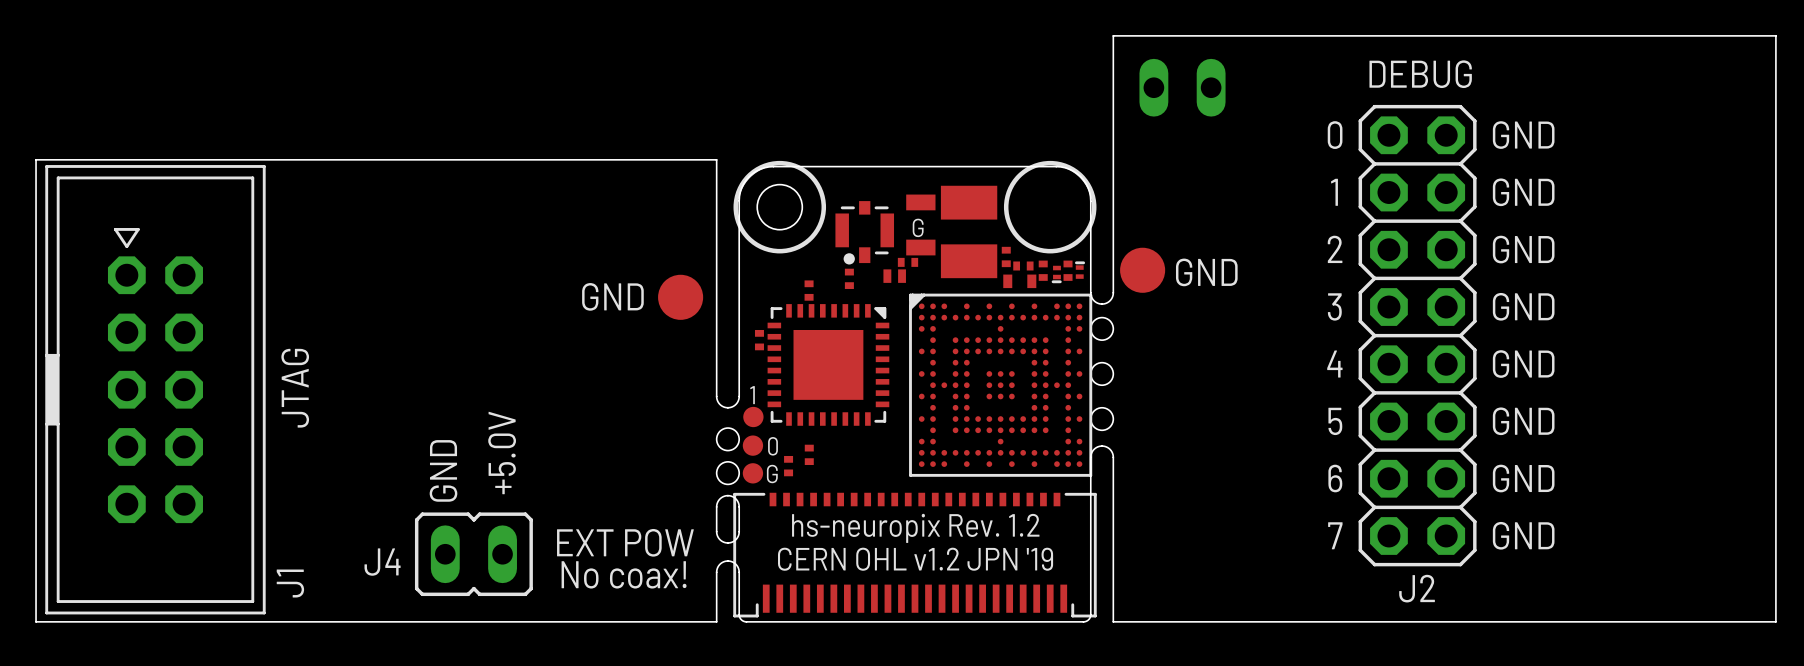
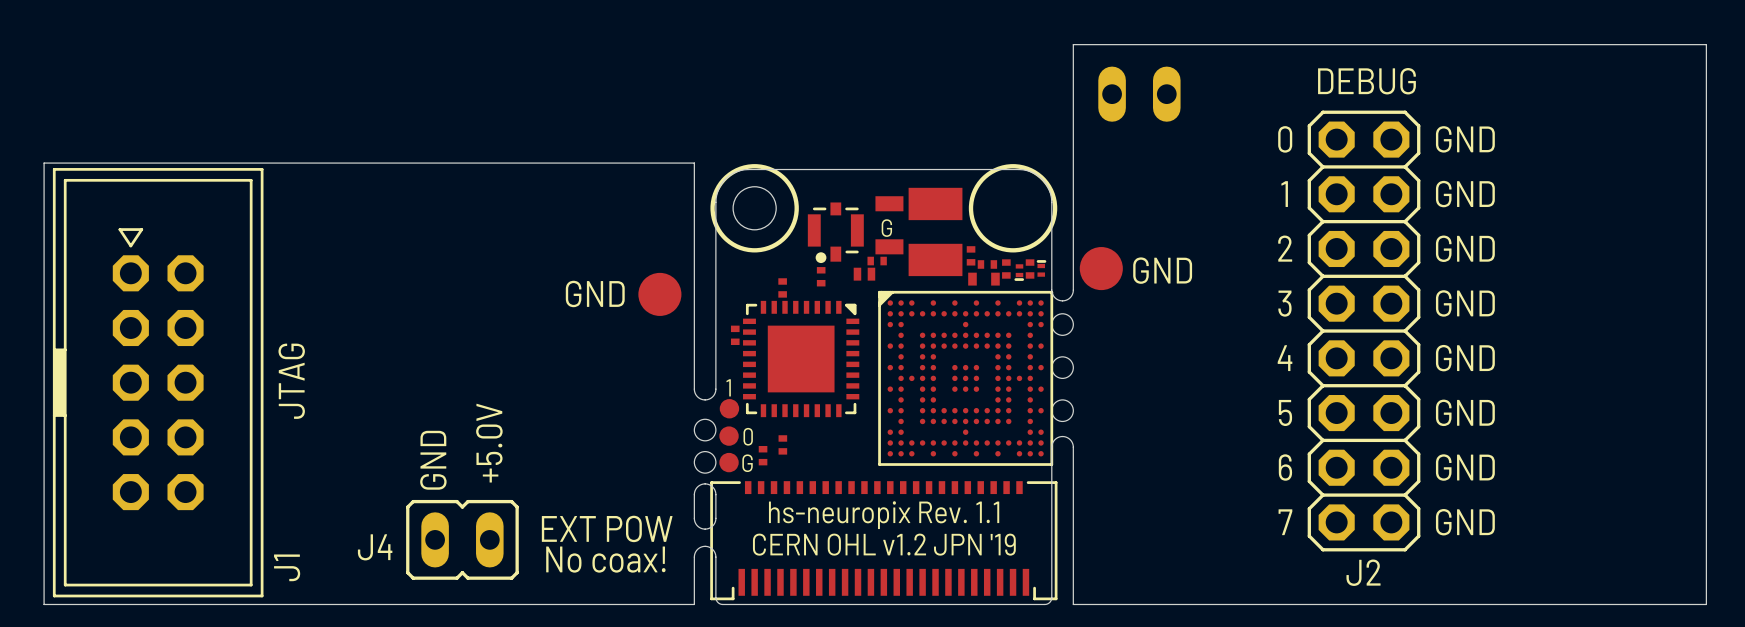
text: hs-neuropix Rev. 1.2 (915, 528) -> hs-neuropix Rev. 1.1 (884, 515)

